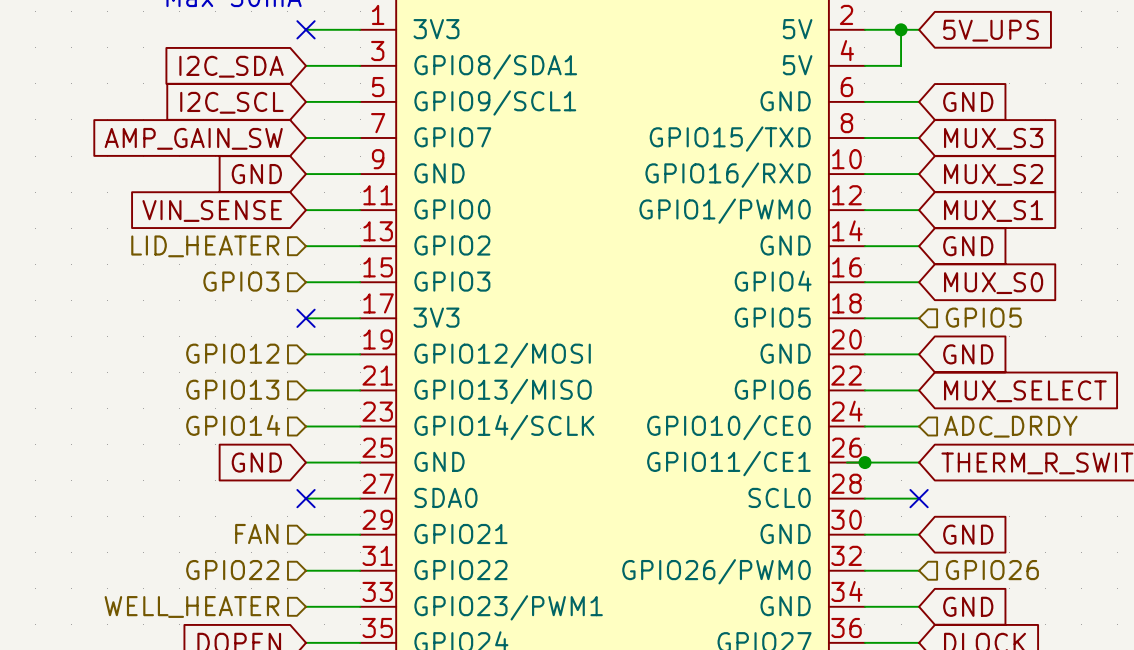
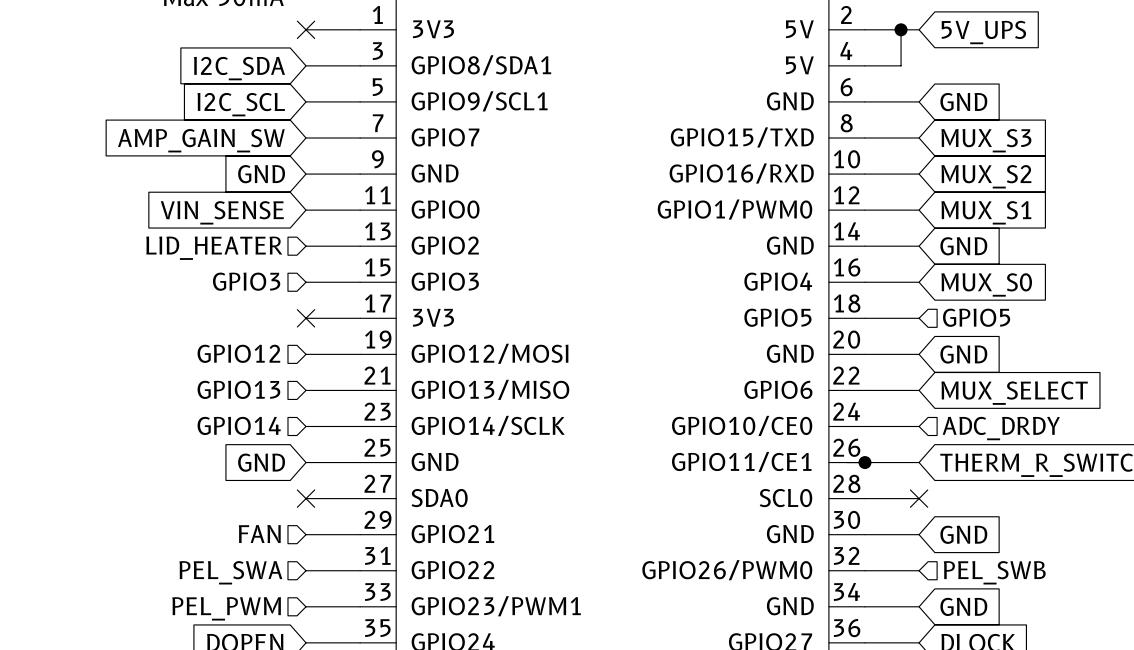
hierarchical label: GPIO22 (232, 570) -> PEL_SWA (230, 572)
hierarchical label: GPIO26 (992, 570) -> PEL_SWB (994, 572)
hierarchical label: WELL_HEATER (191, 606) -> PEL_PWM (226, 608)

